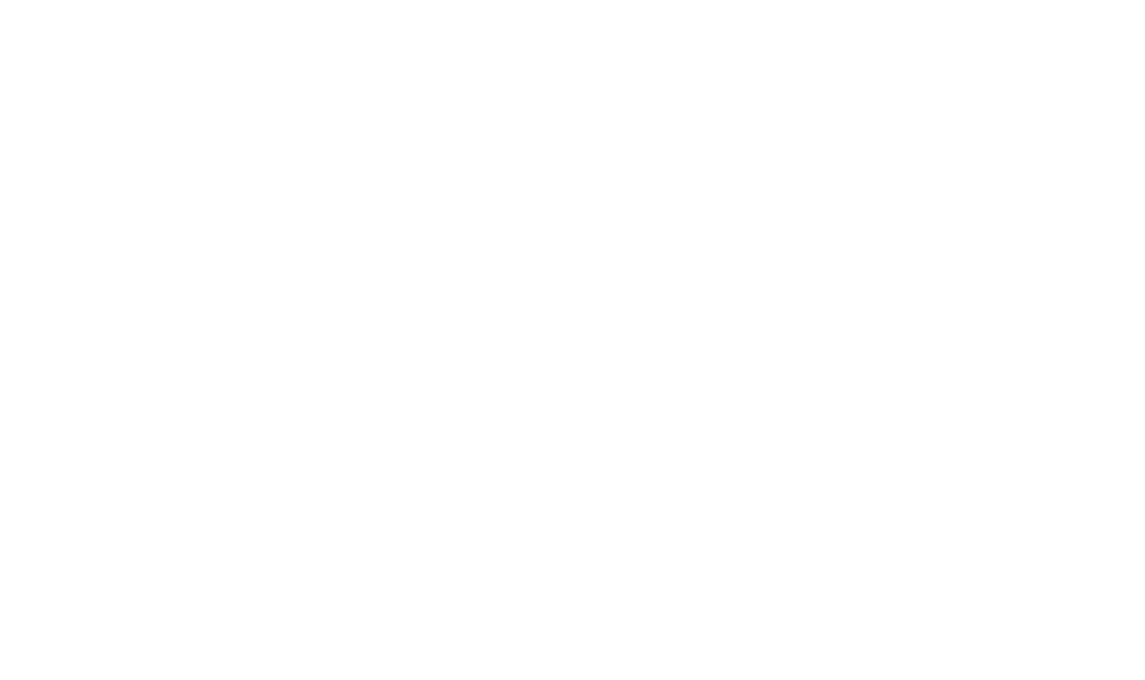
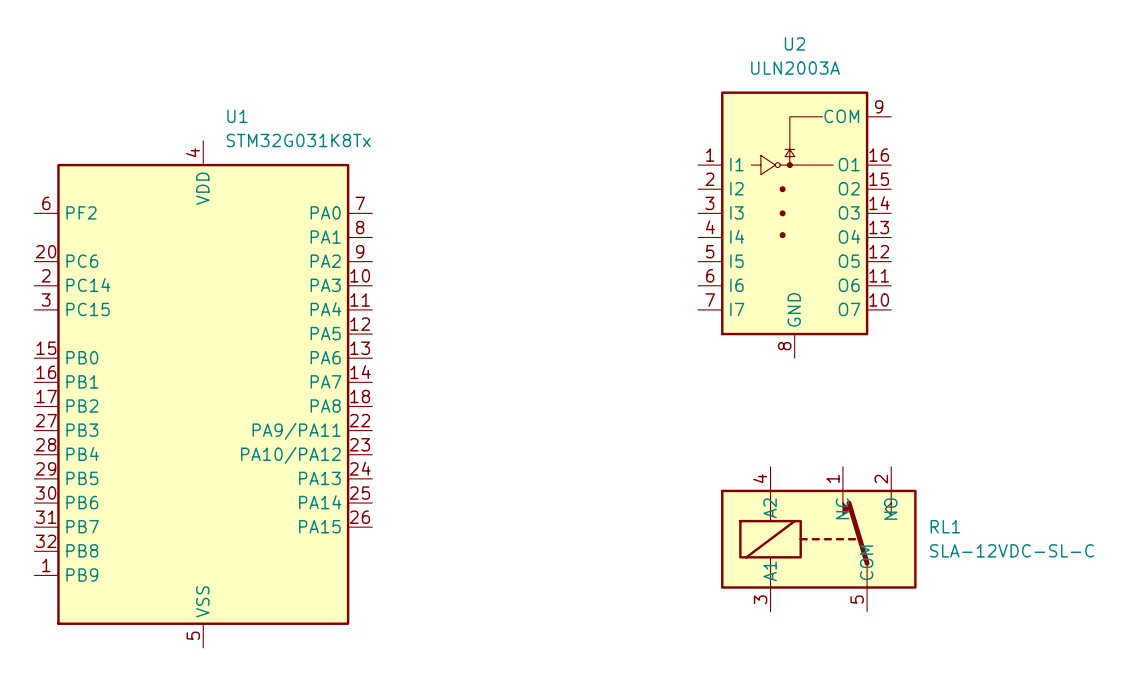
U2: none -> ULN2003A (794, 224)
U1: none -> STM32G031K8Tx (203, 394)
RL1: none -> SLA-12VDC-SL-C (818, 539)

